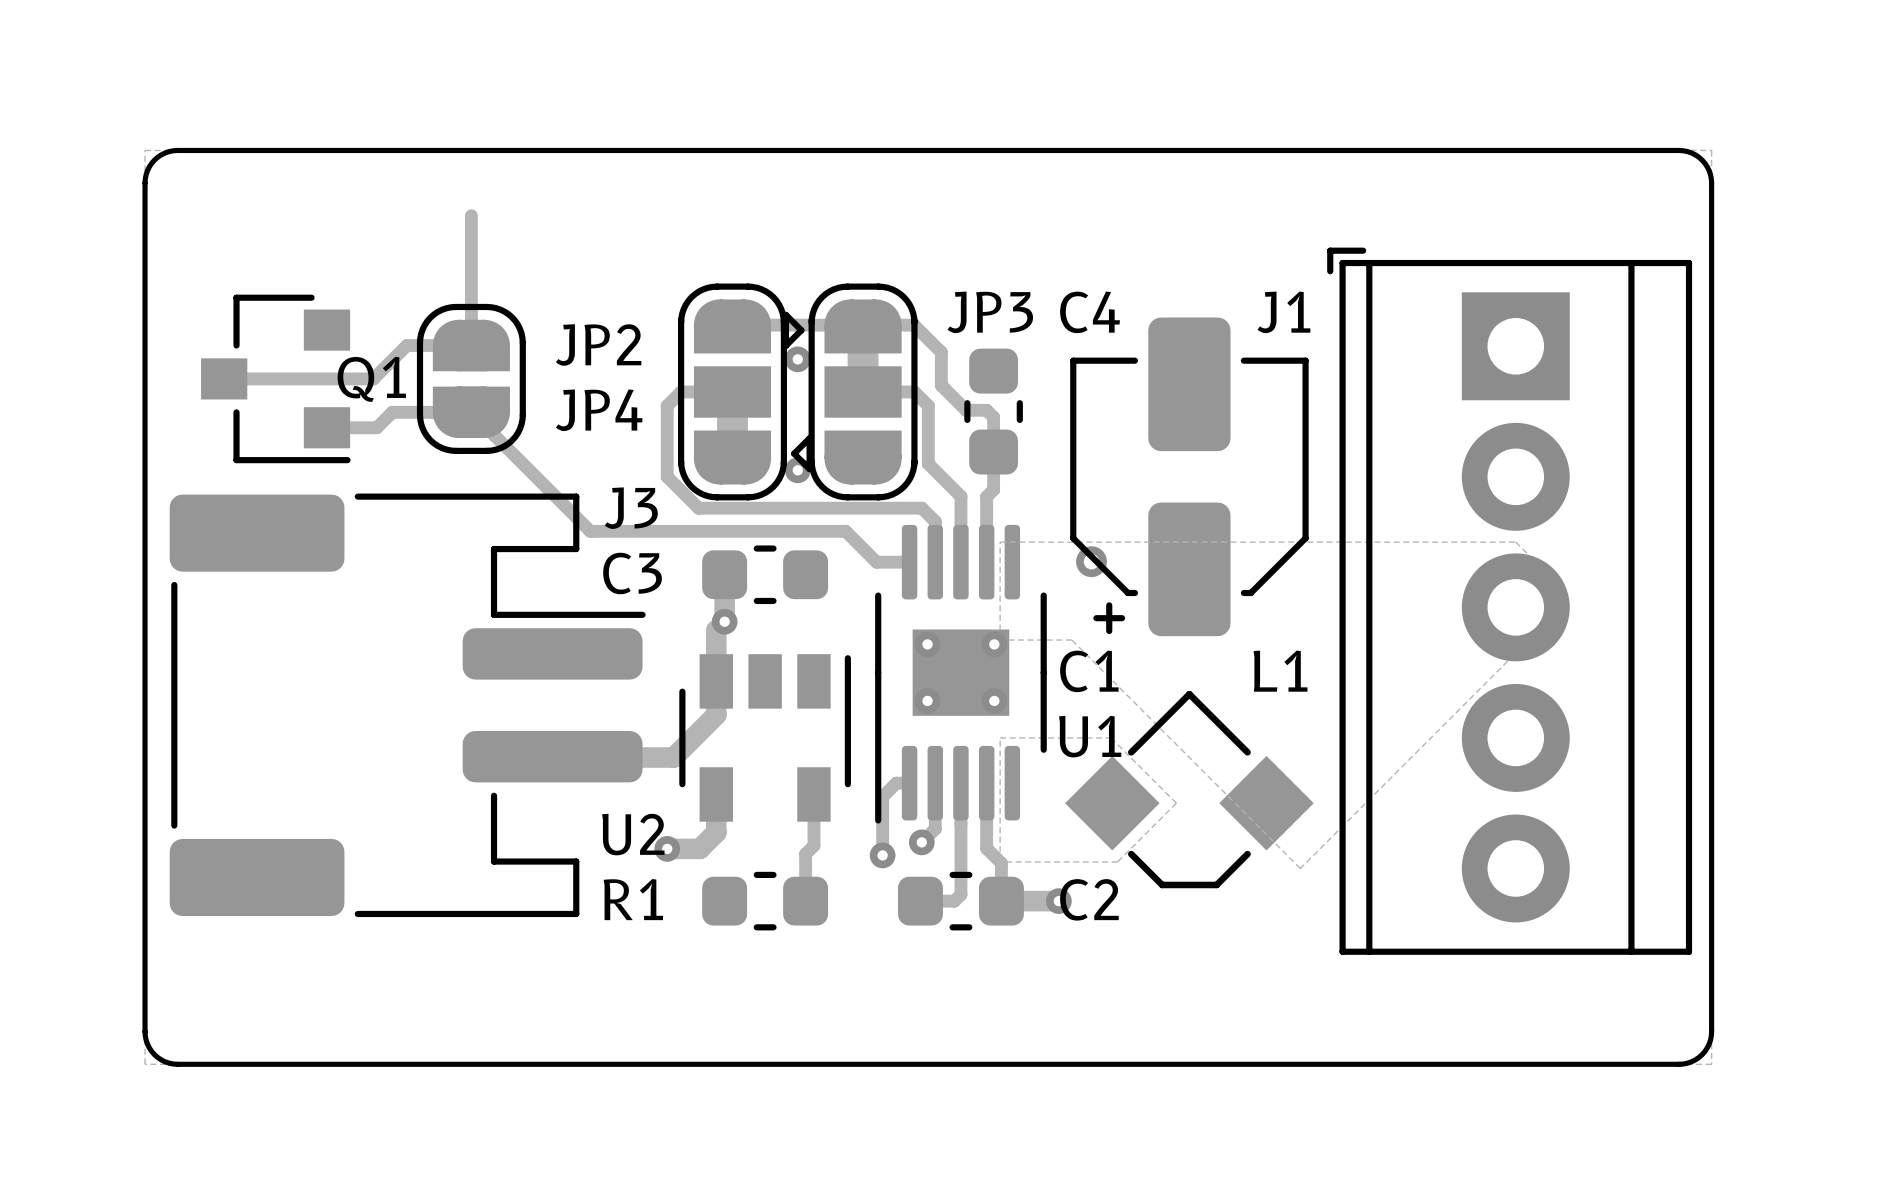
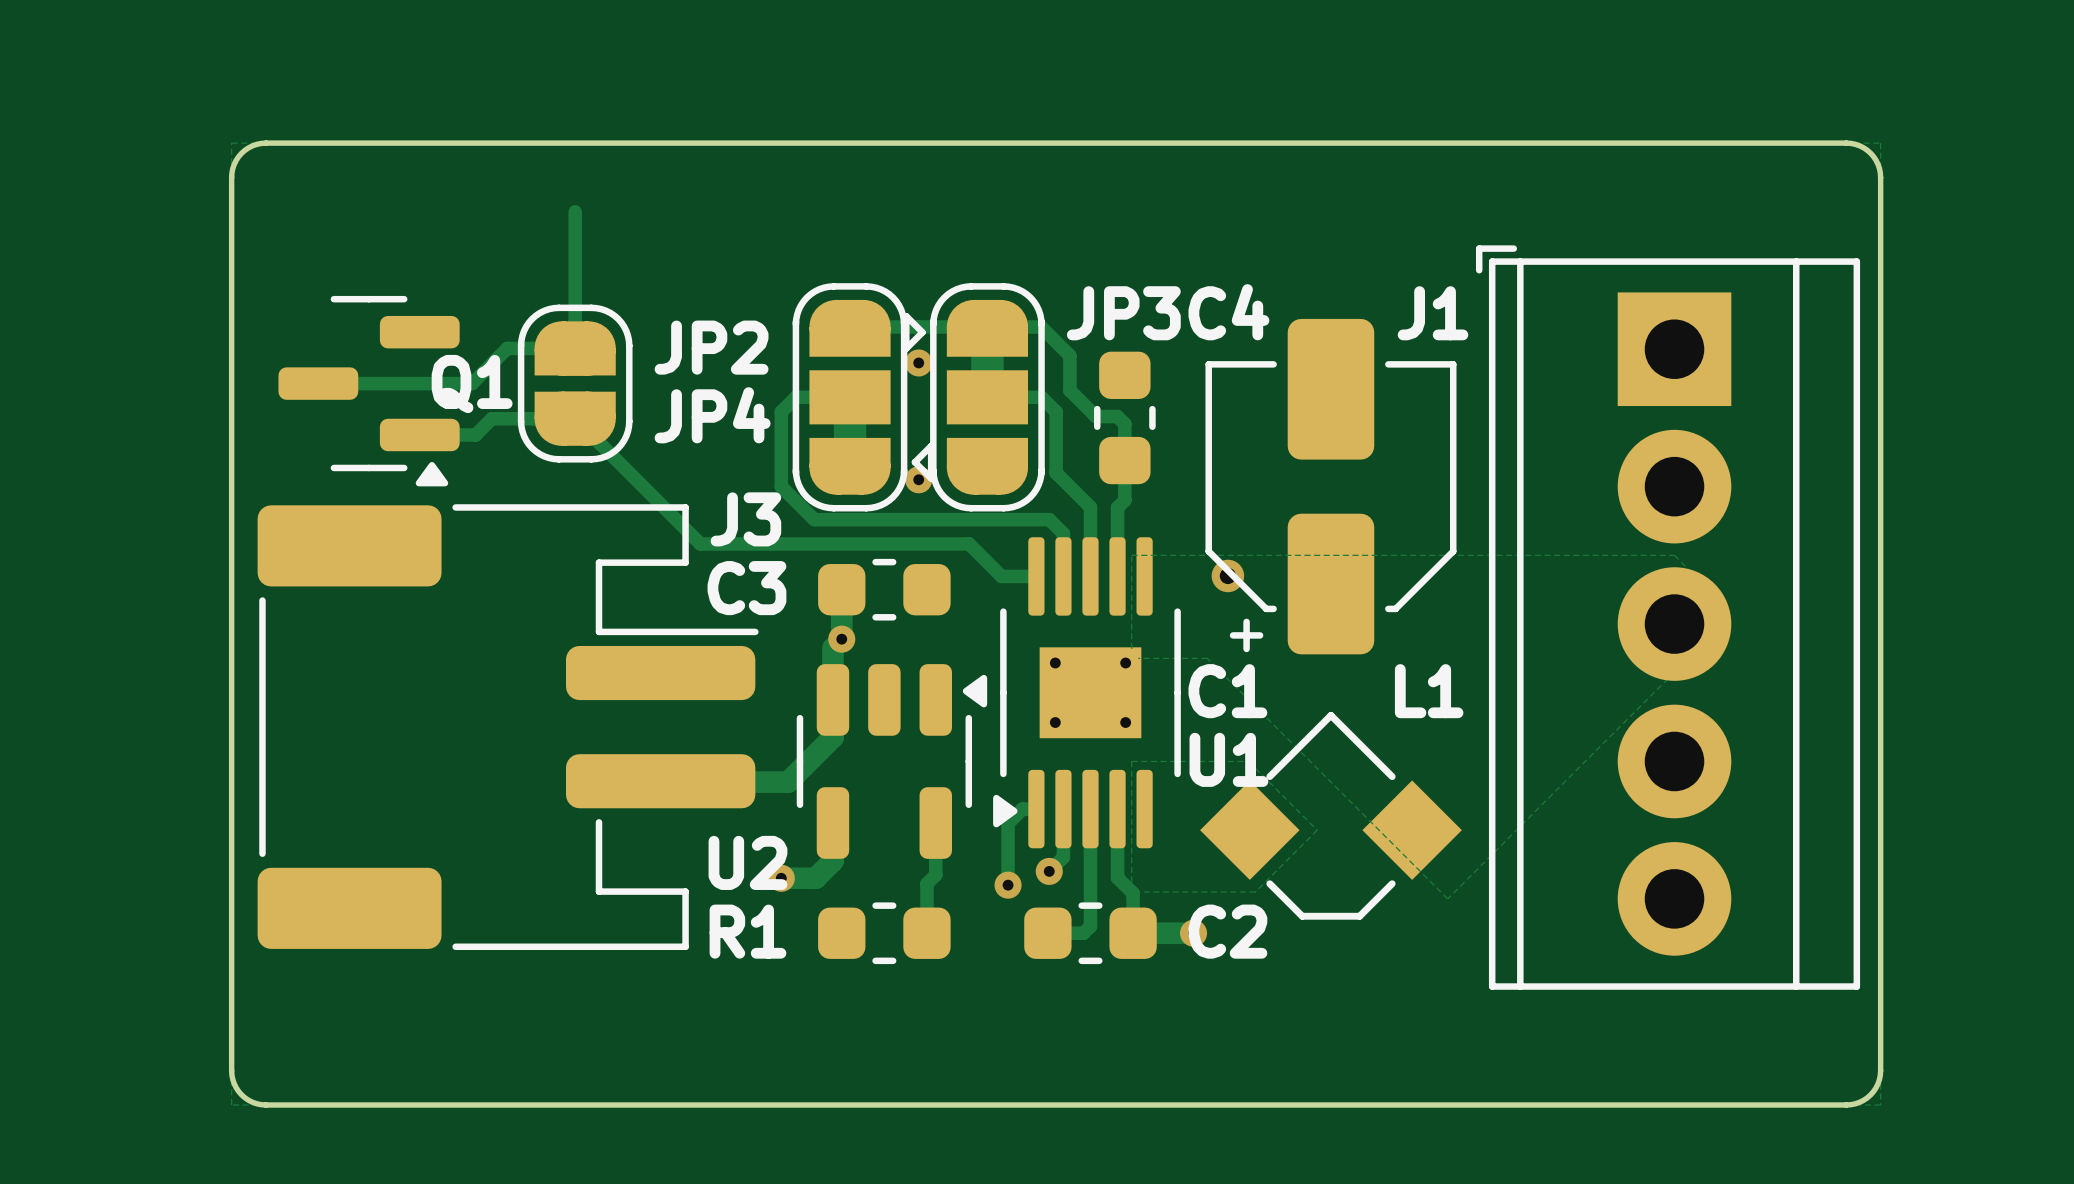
Q1 footprint: [201, 294, 351, 464] -> [278, 295, 460, 487]
U1 footprint: [875, 524, 1047, 824] -> [993, 537, 1181, 849]
U2 footprint: [679, 654, 851, 822] -> [796, 664, 988, 859]

